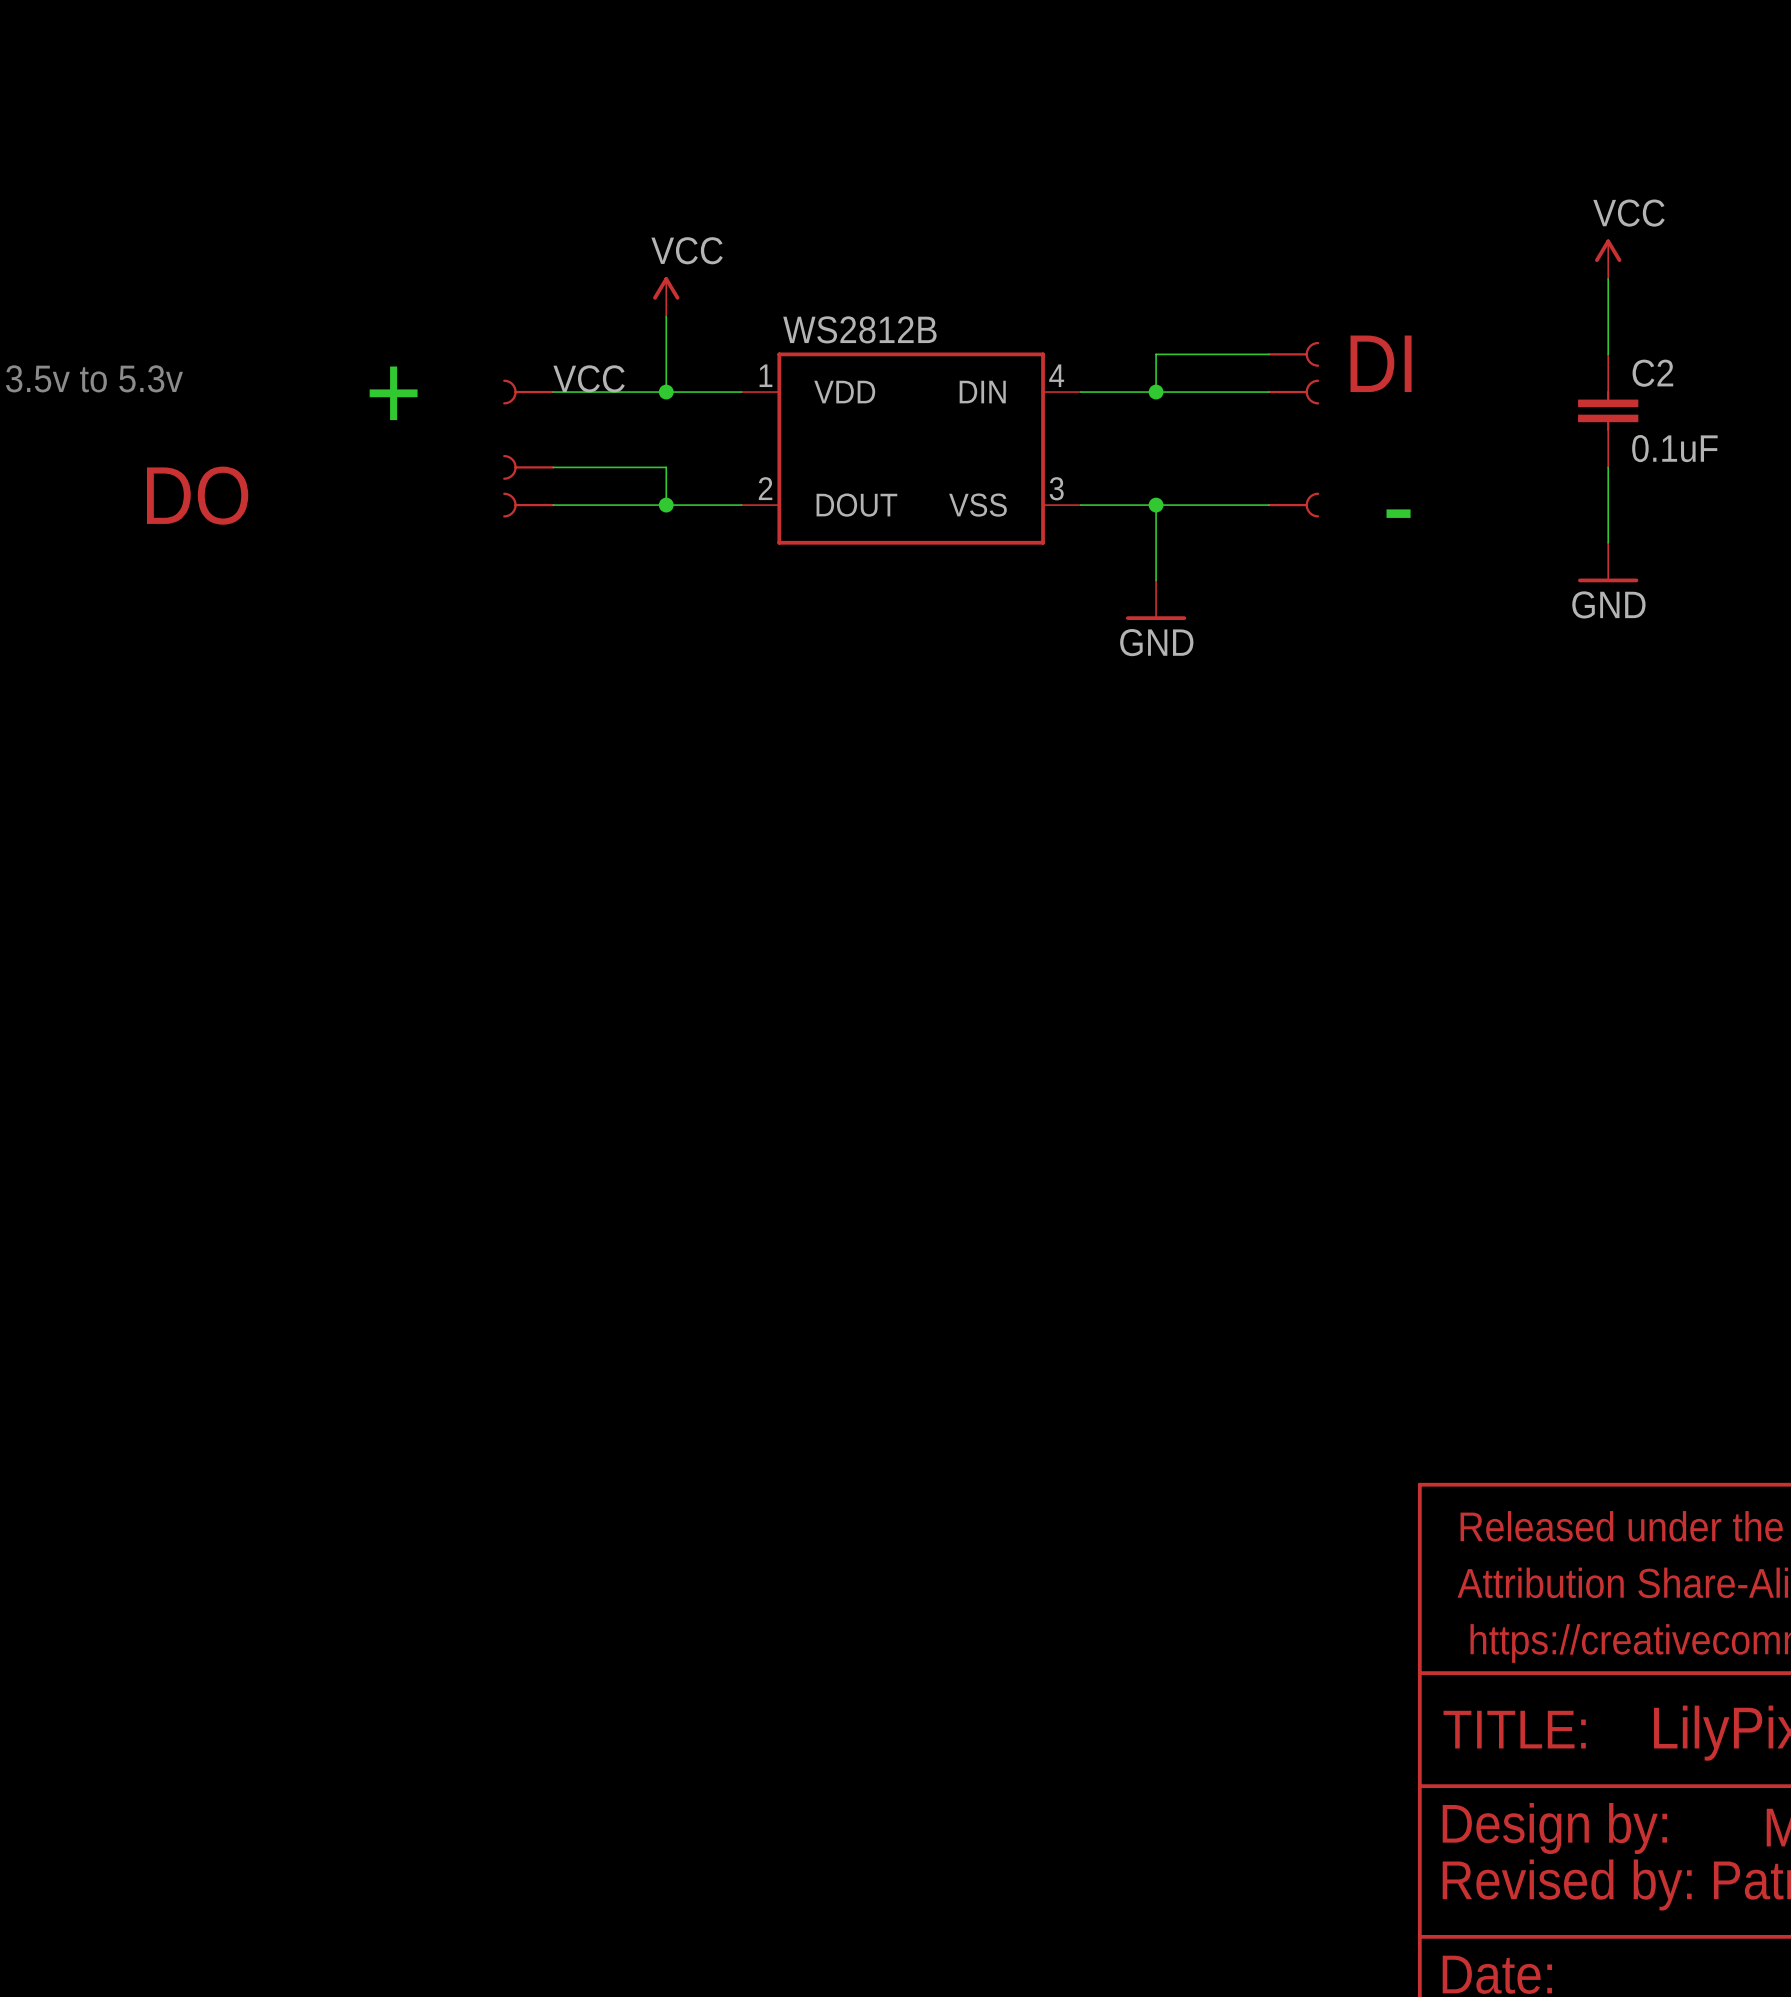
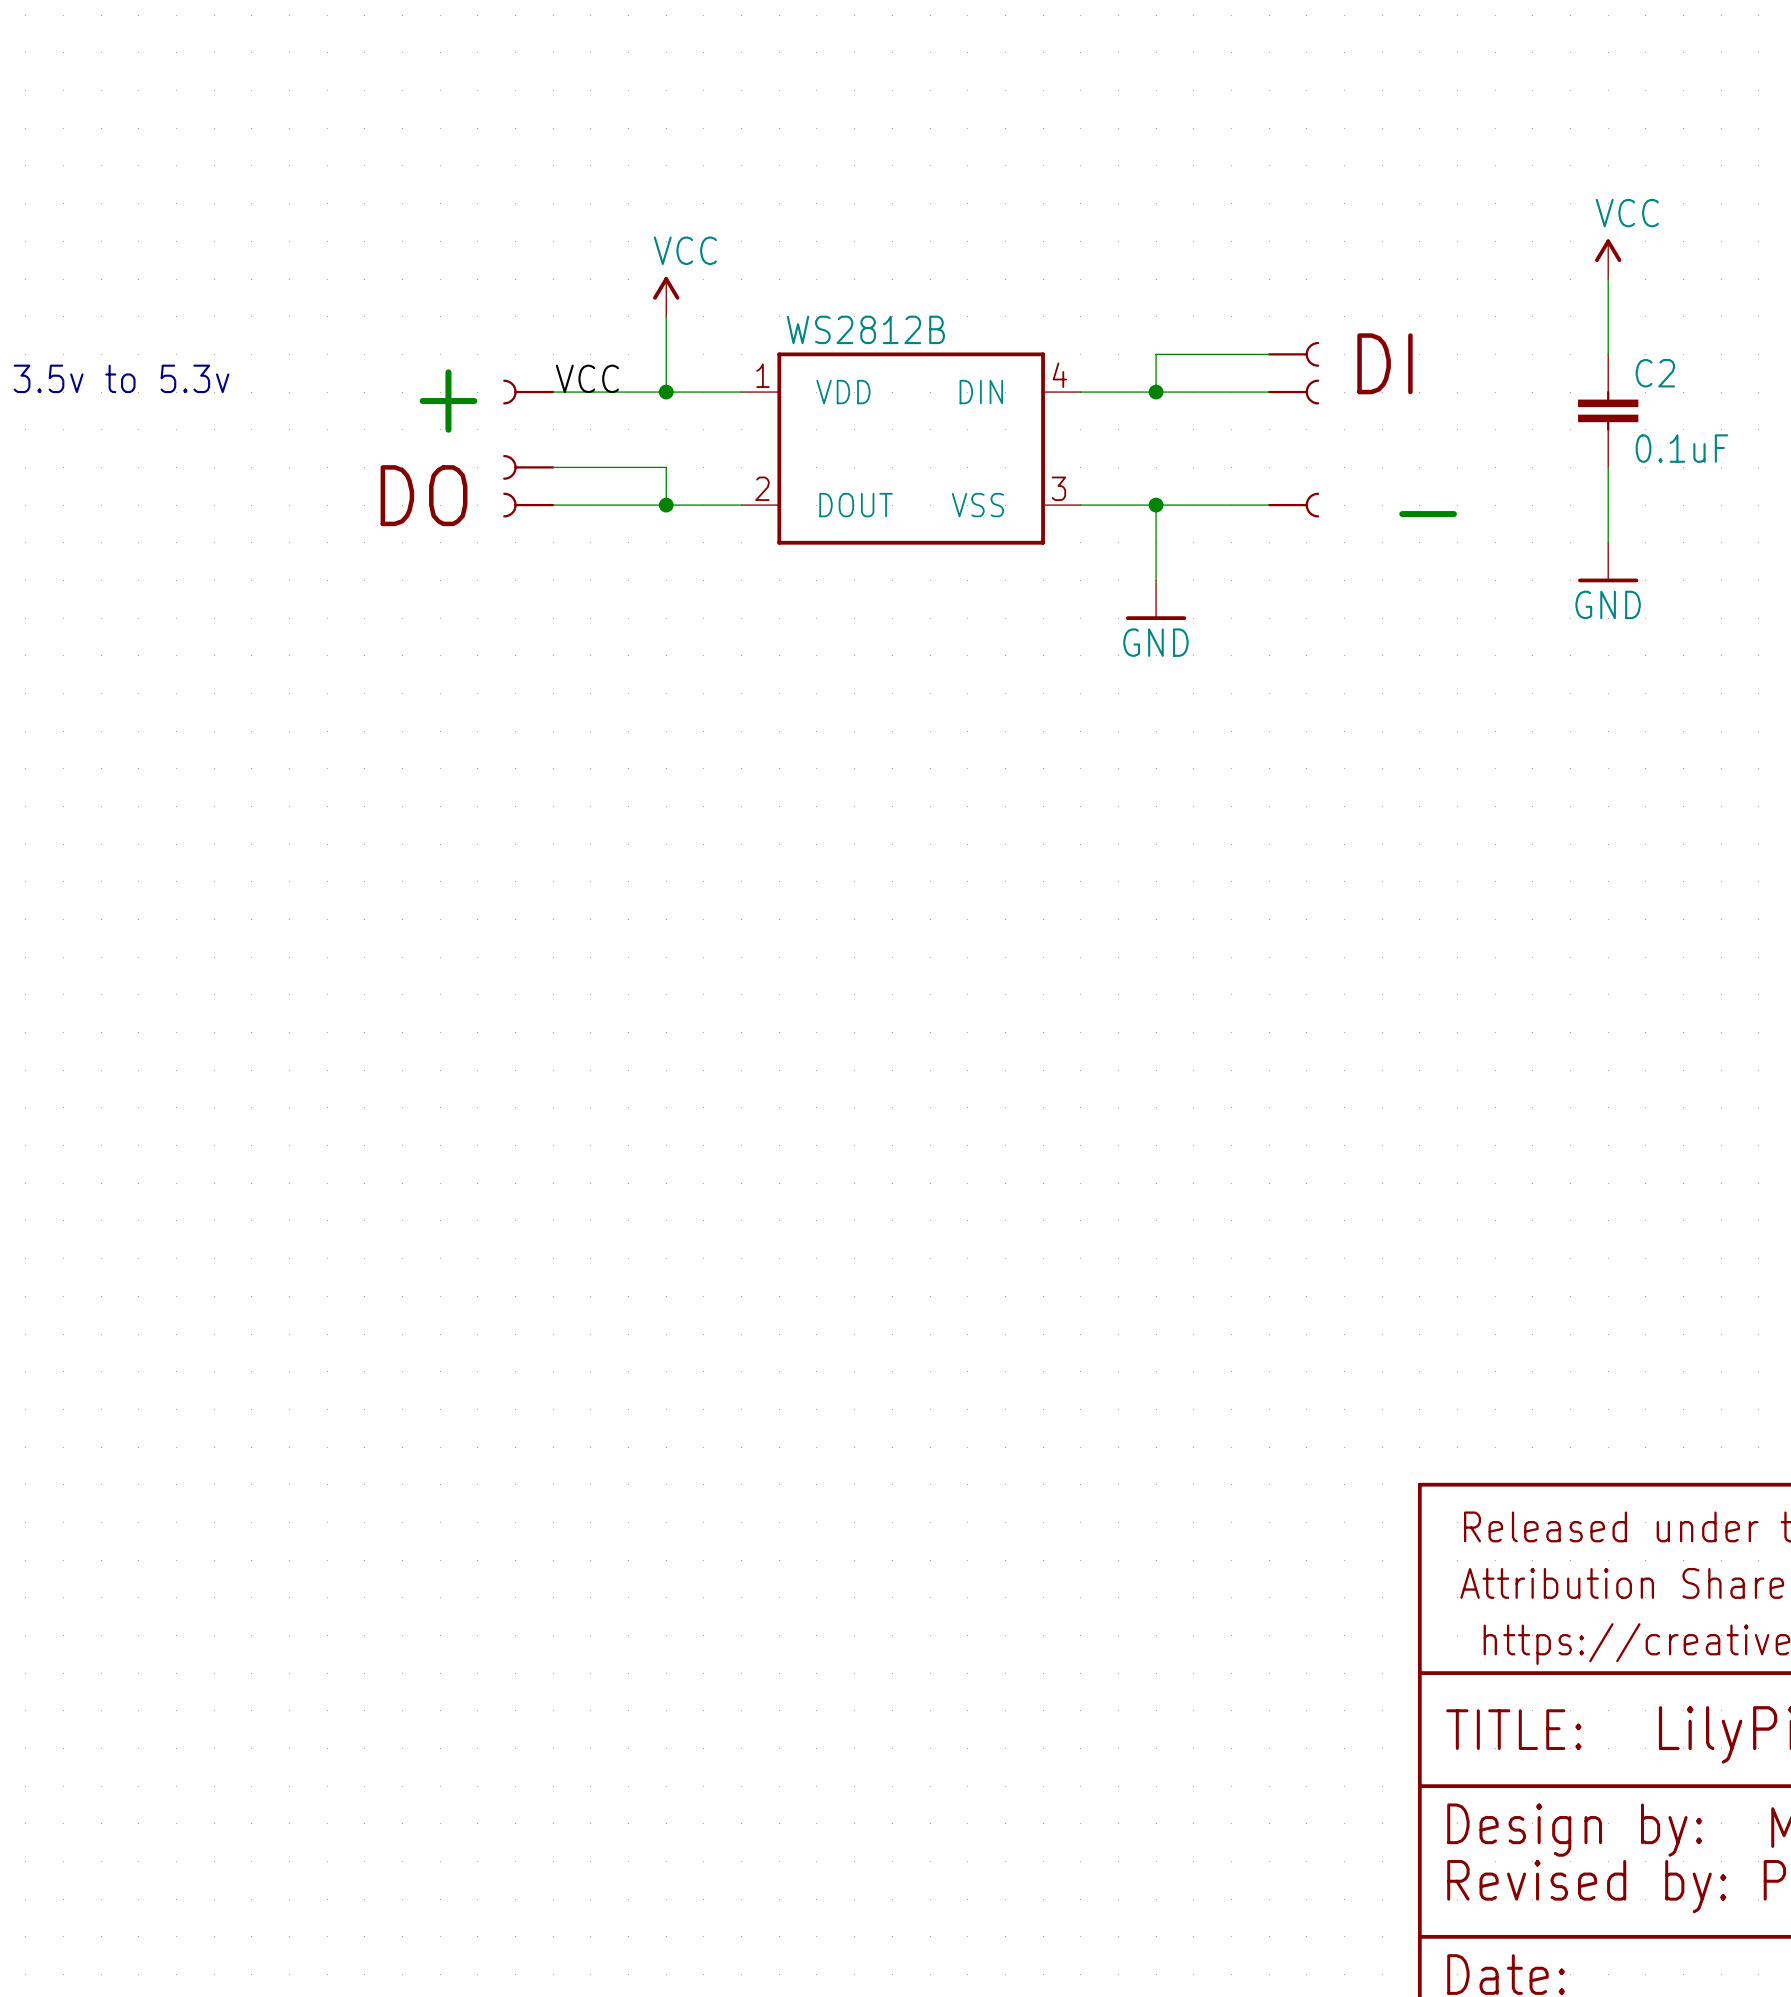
text position: + (393, 393) -> + (448, 401)
text position: DO (197, 495) -> DO (424, 495)

